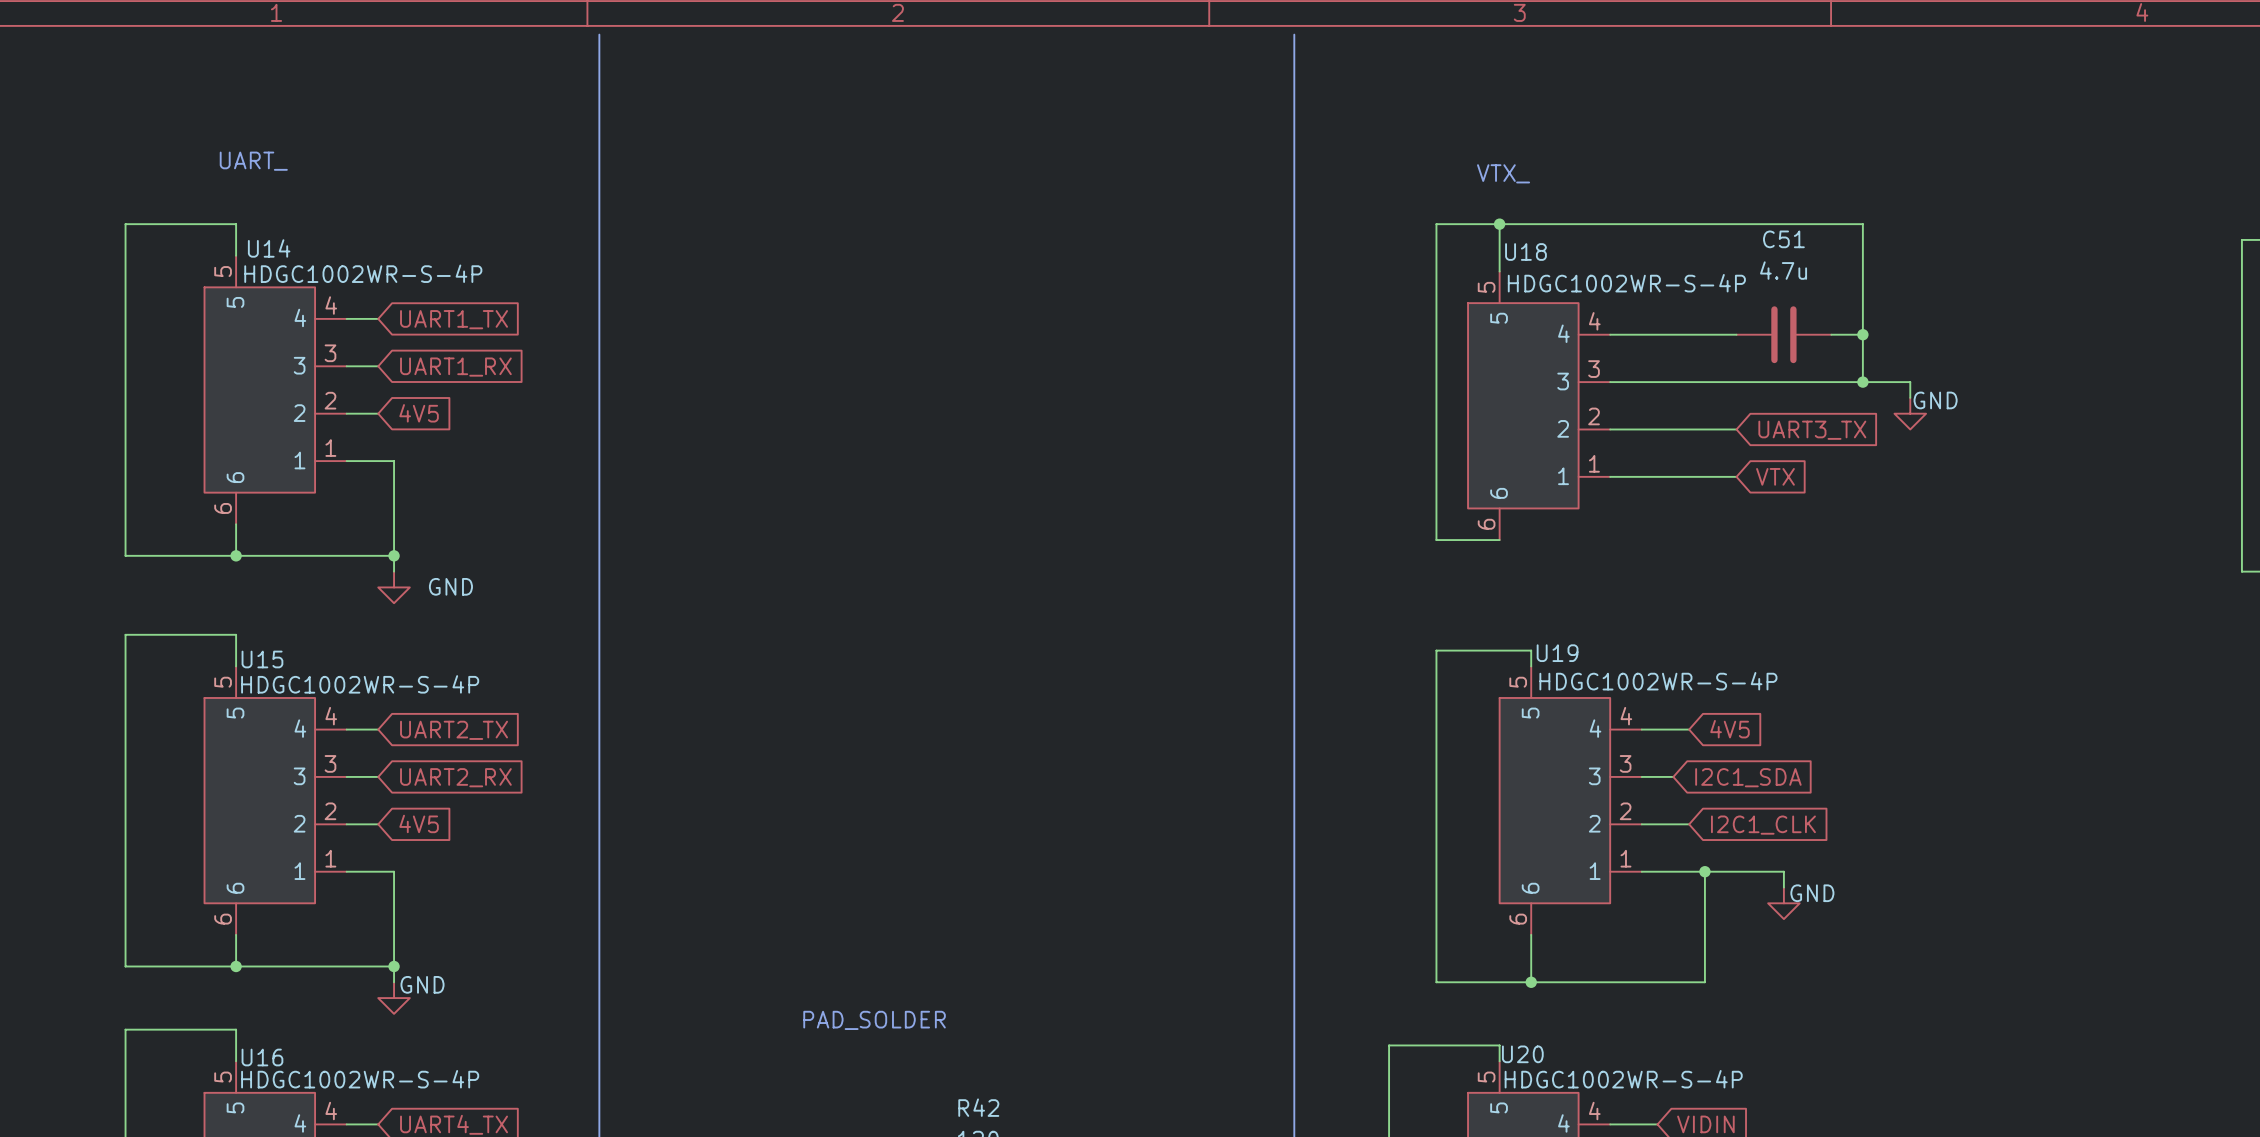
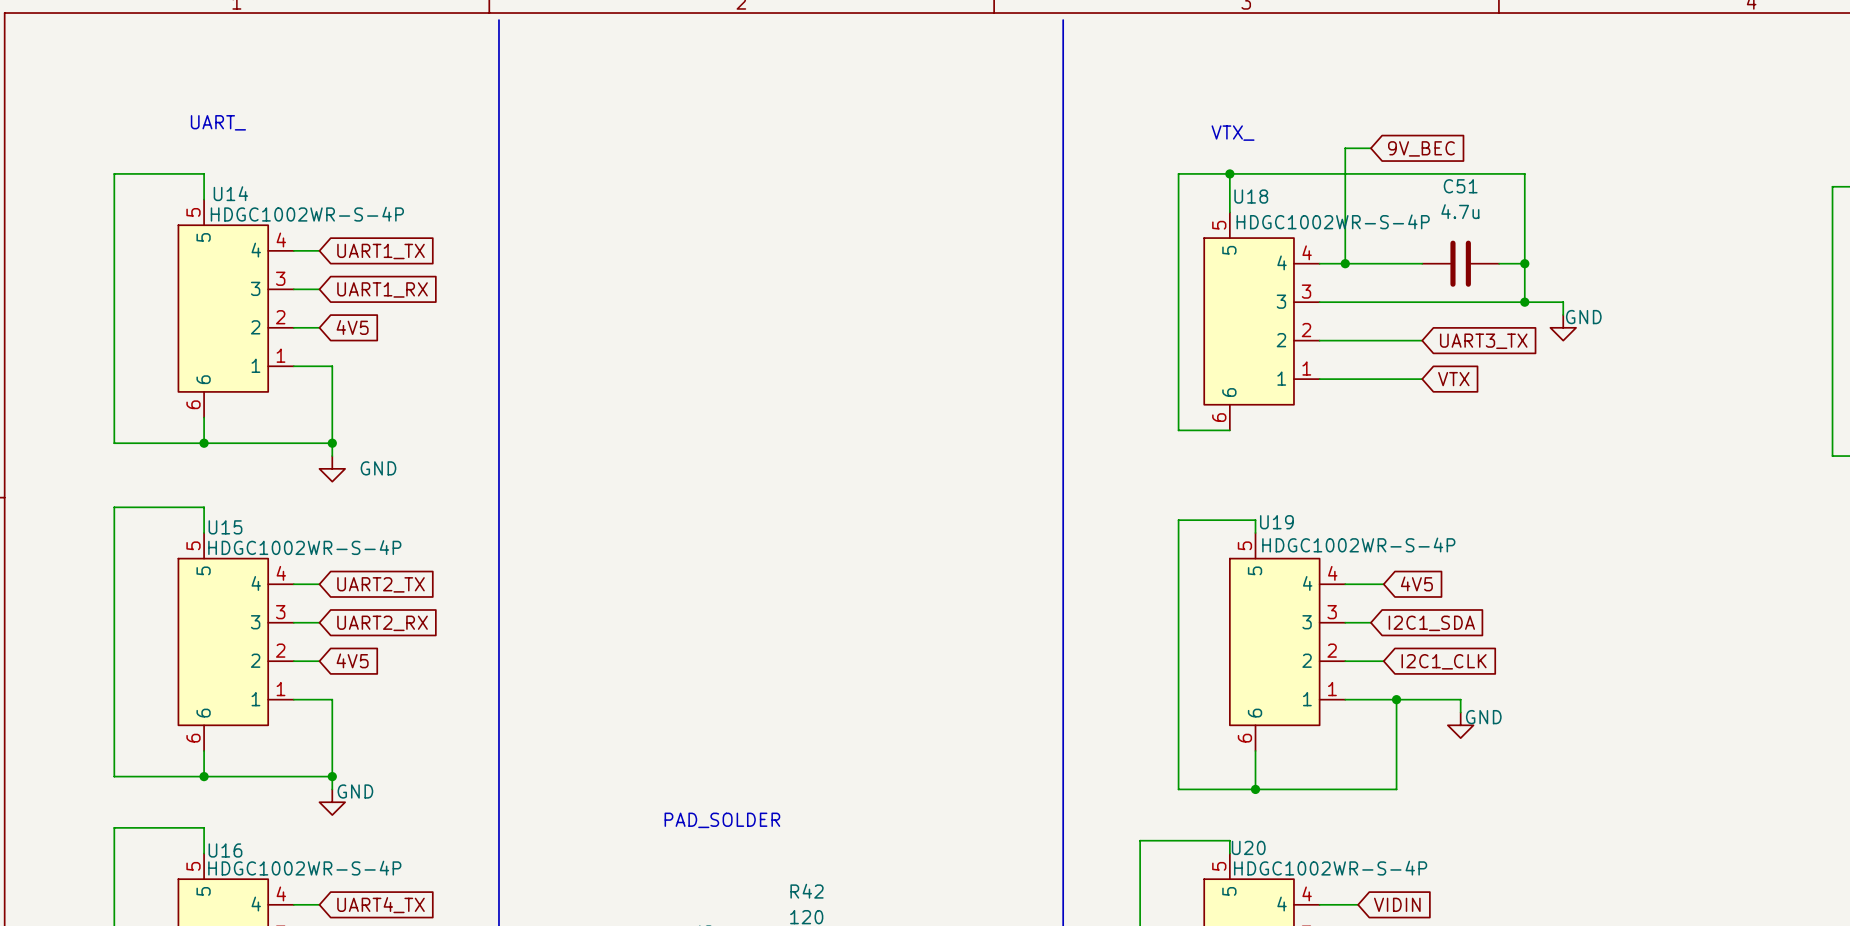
wire: none -> (1370, 148) (1345, 148) (1345, 263)
global label: none -> 9V_BEC (1421, 148)
junction: none -> (1345, 263)

